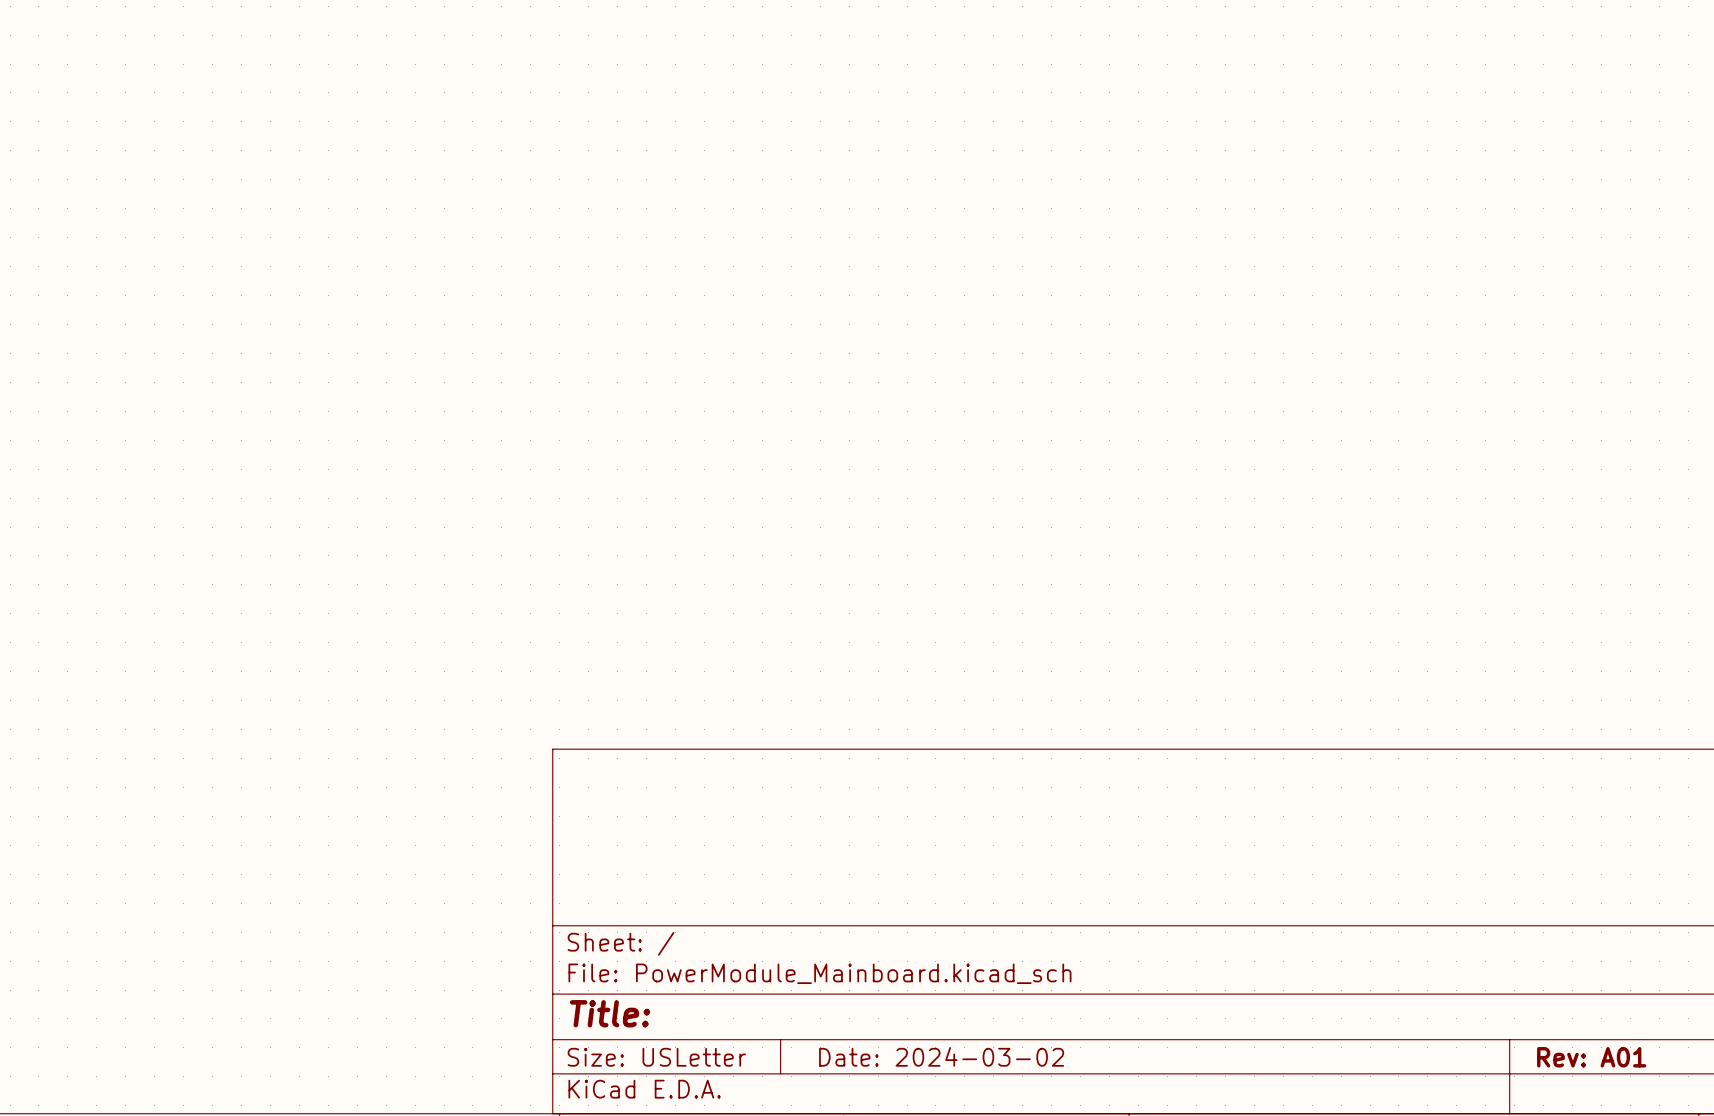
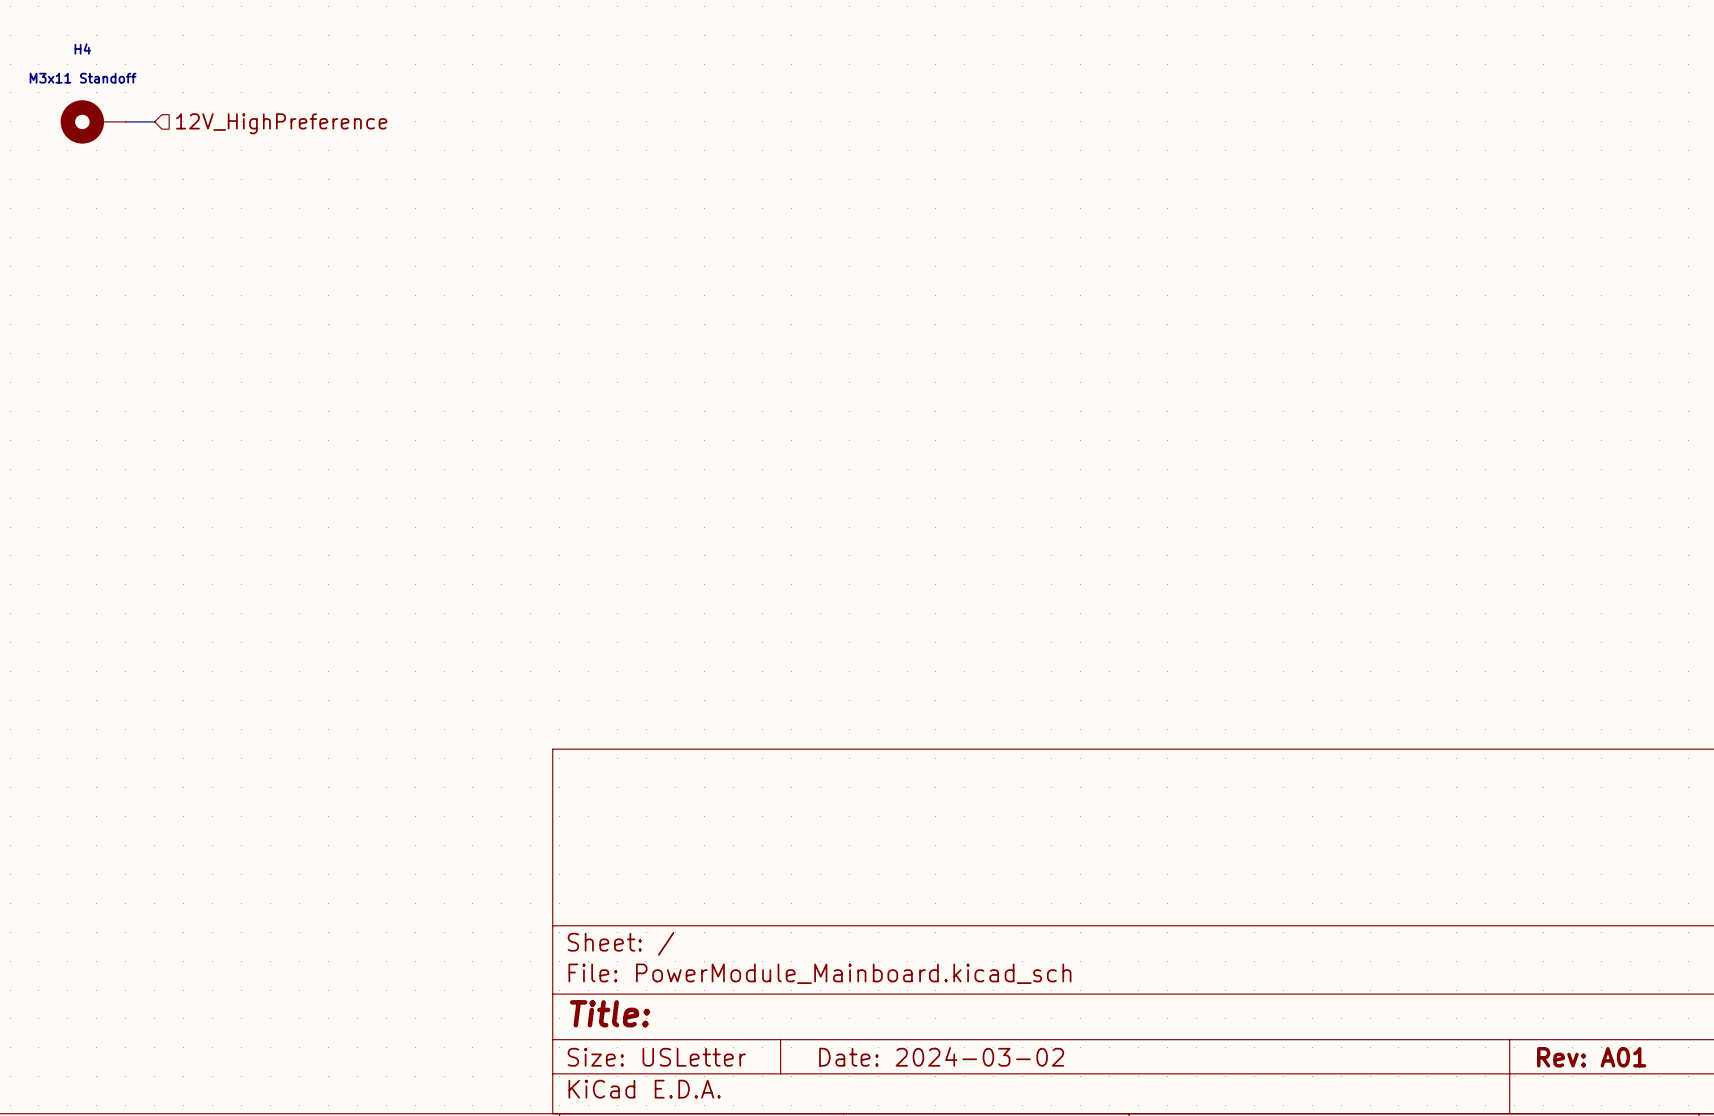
H4: none -> M3x11 Standoff (93, 121)
wire: none -> (125, 121) (154, 121)
hierarchical label: none -> 12V_HighPreference (281, 123)

